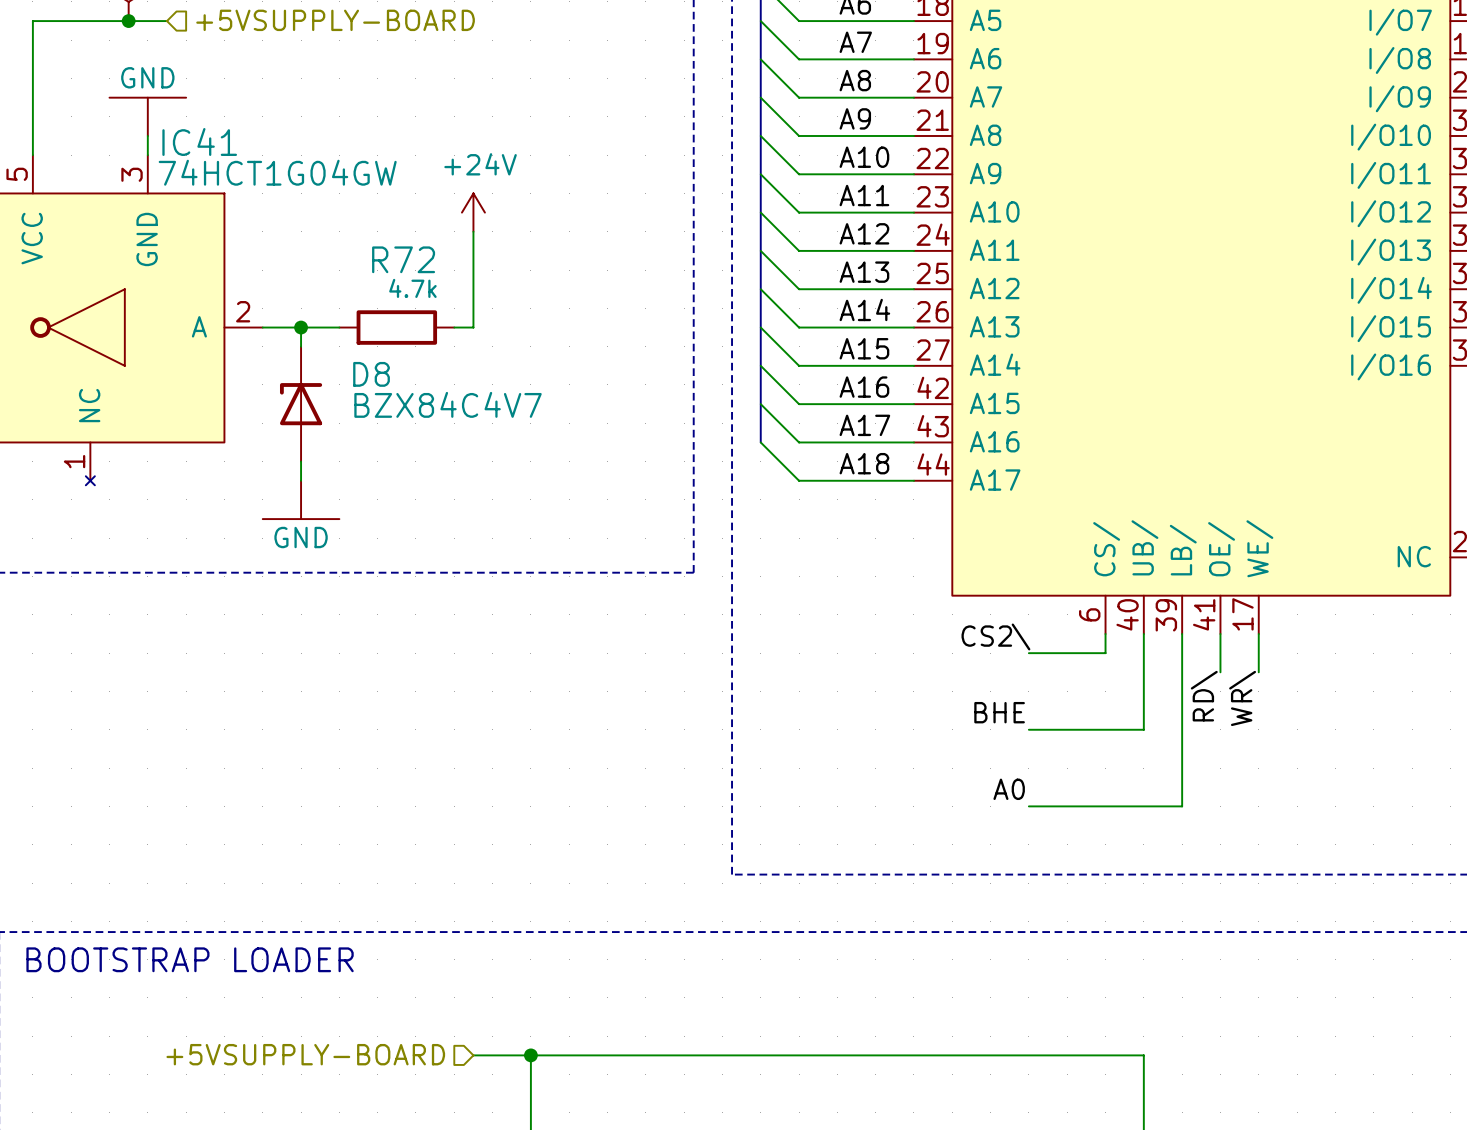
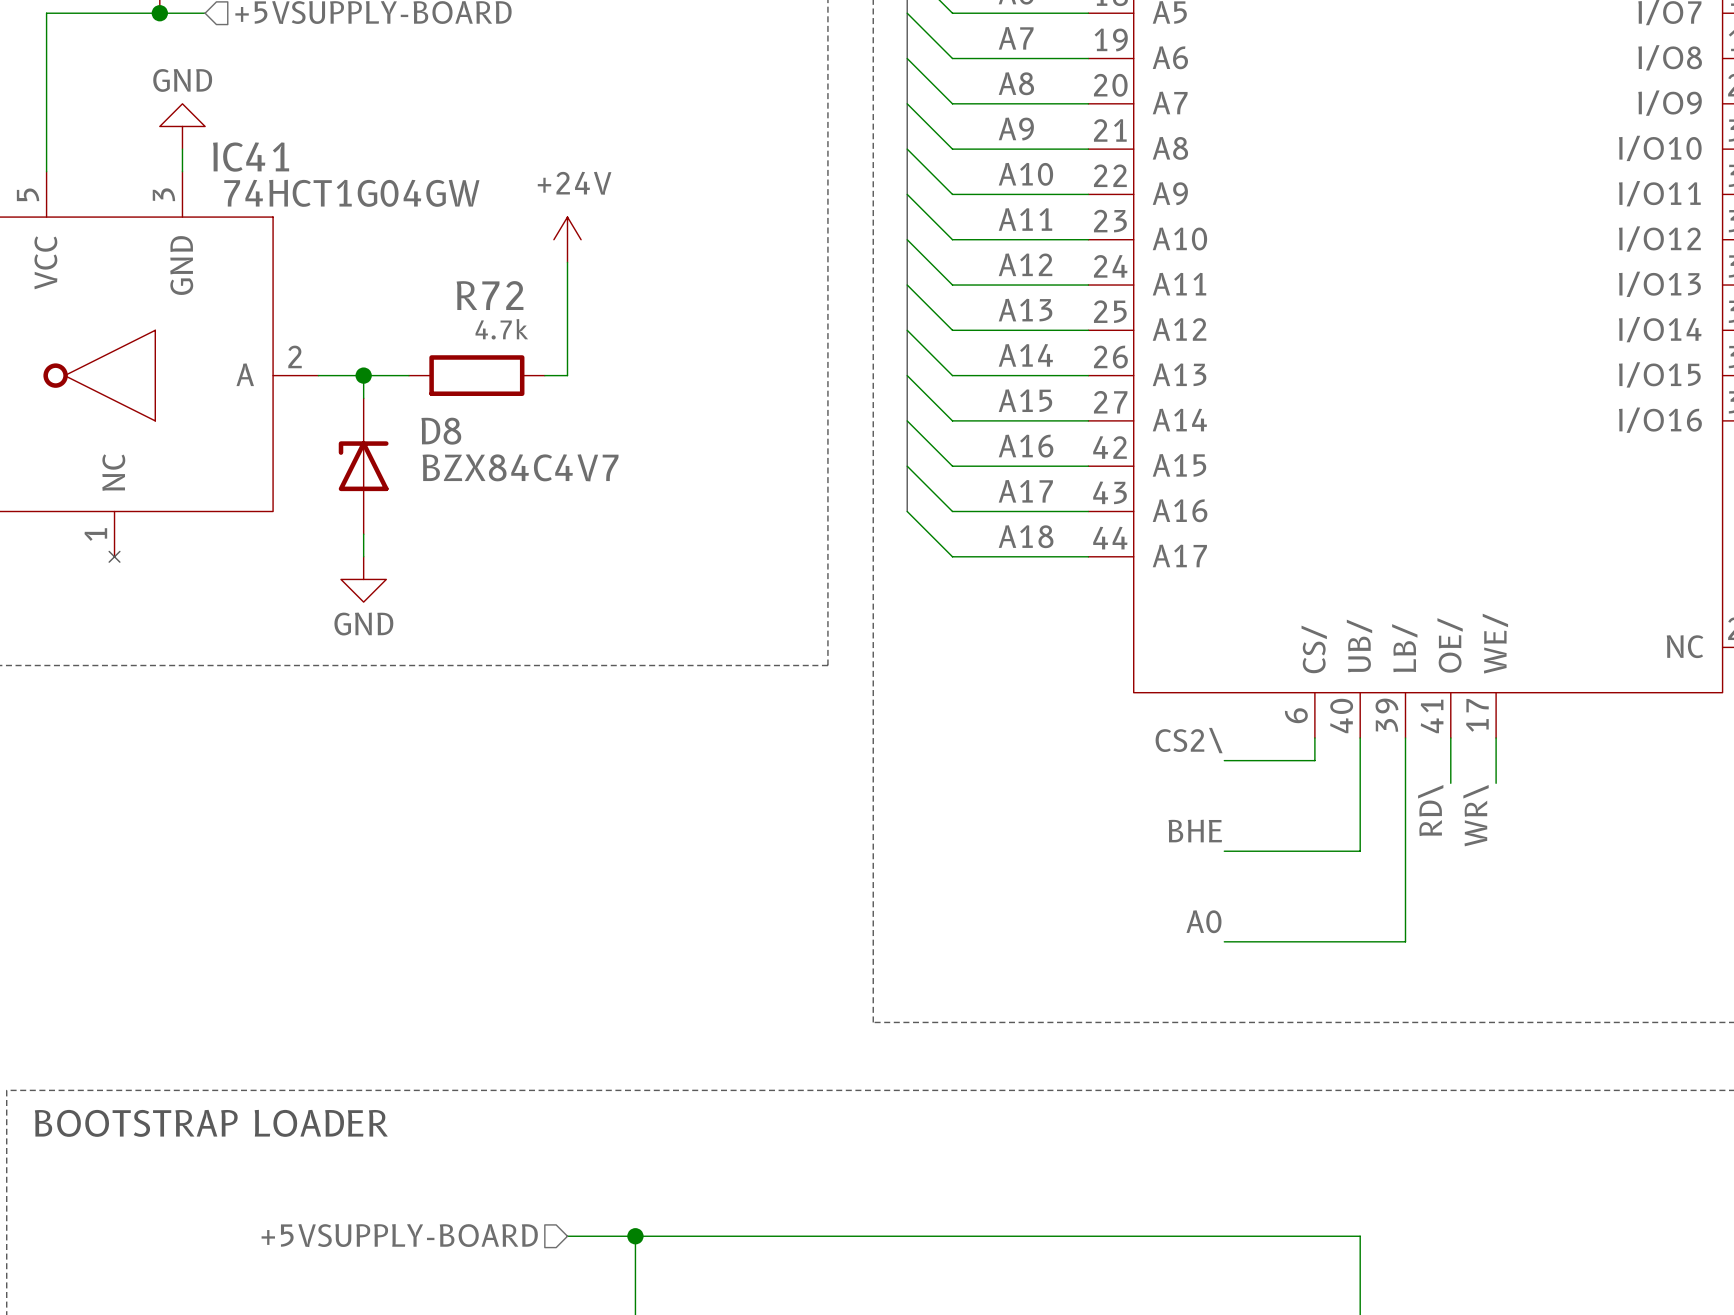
power symbol shape: [109, 97, 187, 136] -> [159, 103, 206, 150]
power symbol shape: [262, 480, 340, 520] -> [341, 556, 387, 603]

